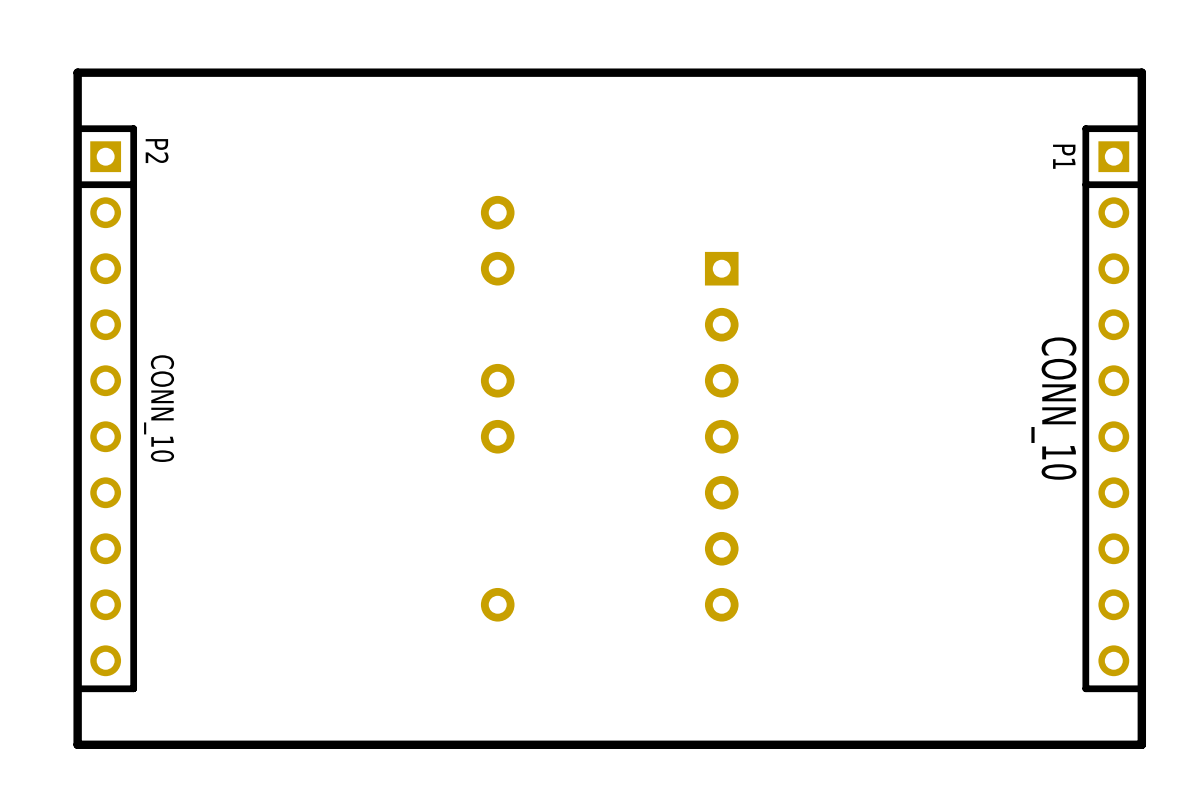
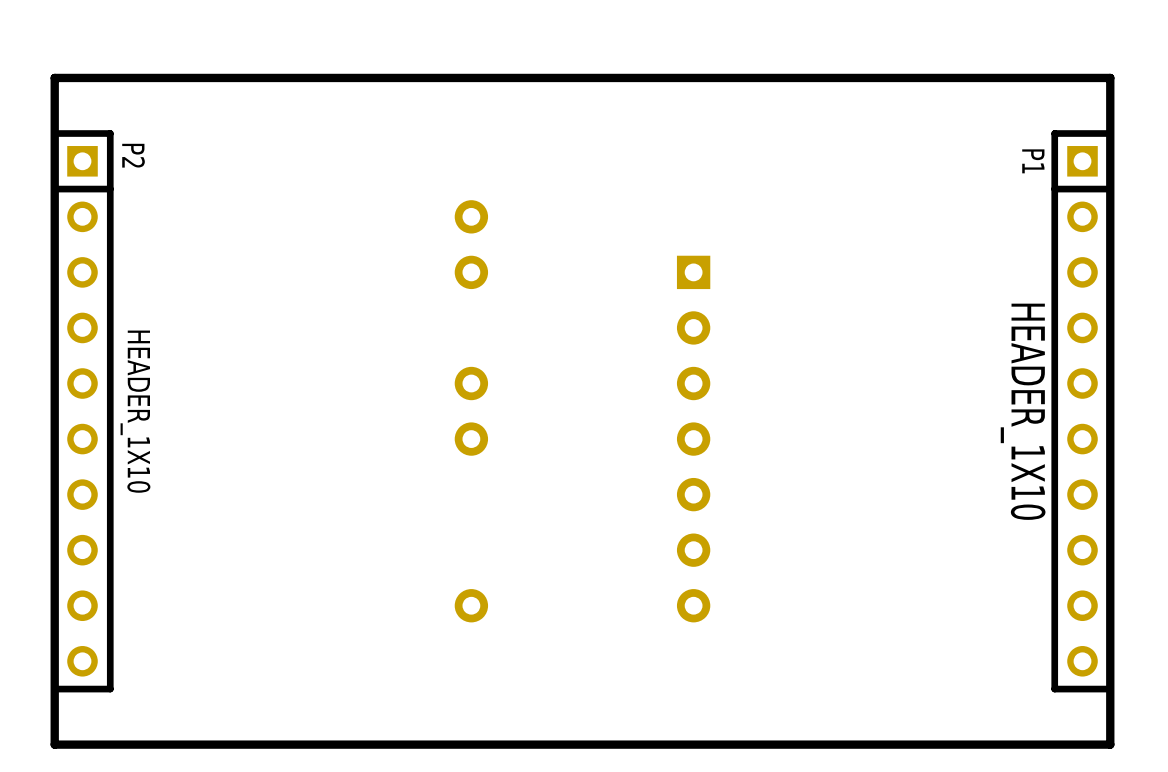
P2 value: CONN_10 (159, 408) -> HEADER_1X10 (135, 411)
P1 value: CONN_10 (1053, 408) -> HEADER_1X10 (1023, 411)

